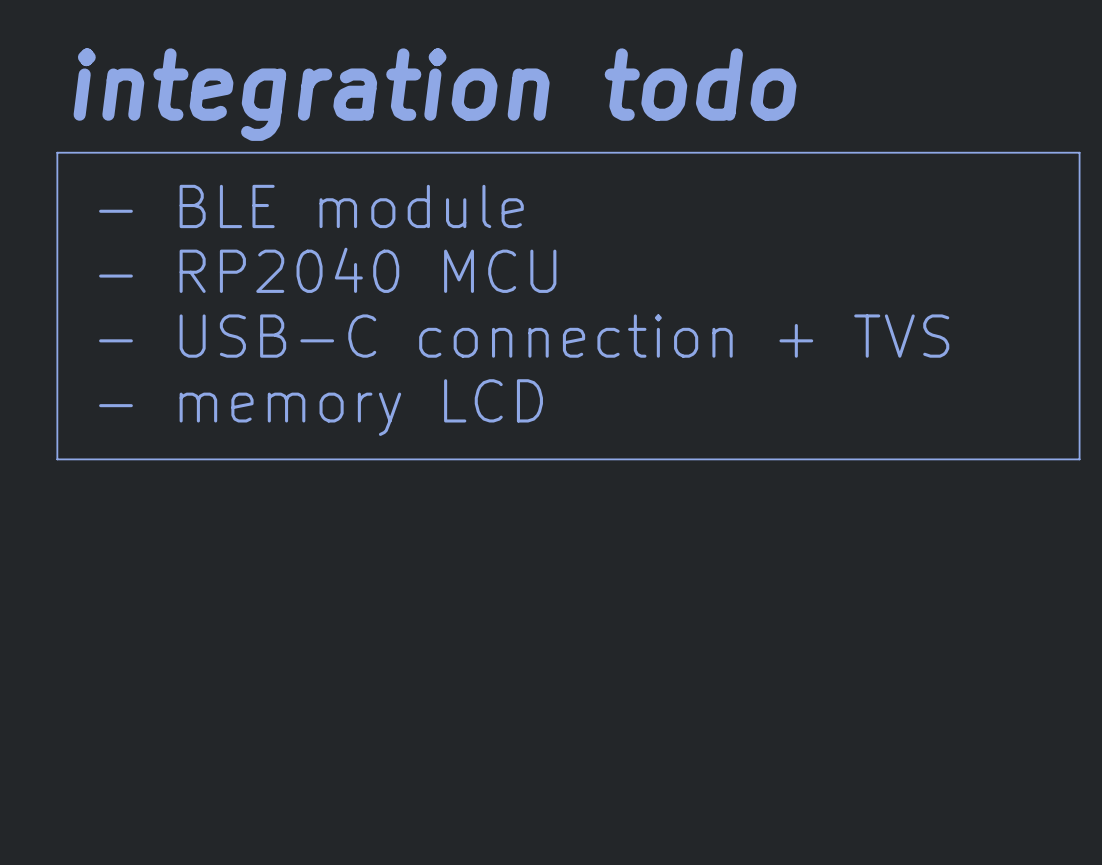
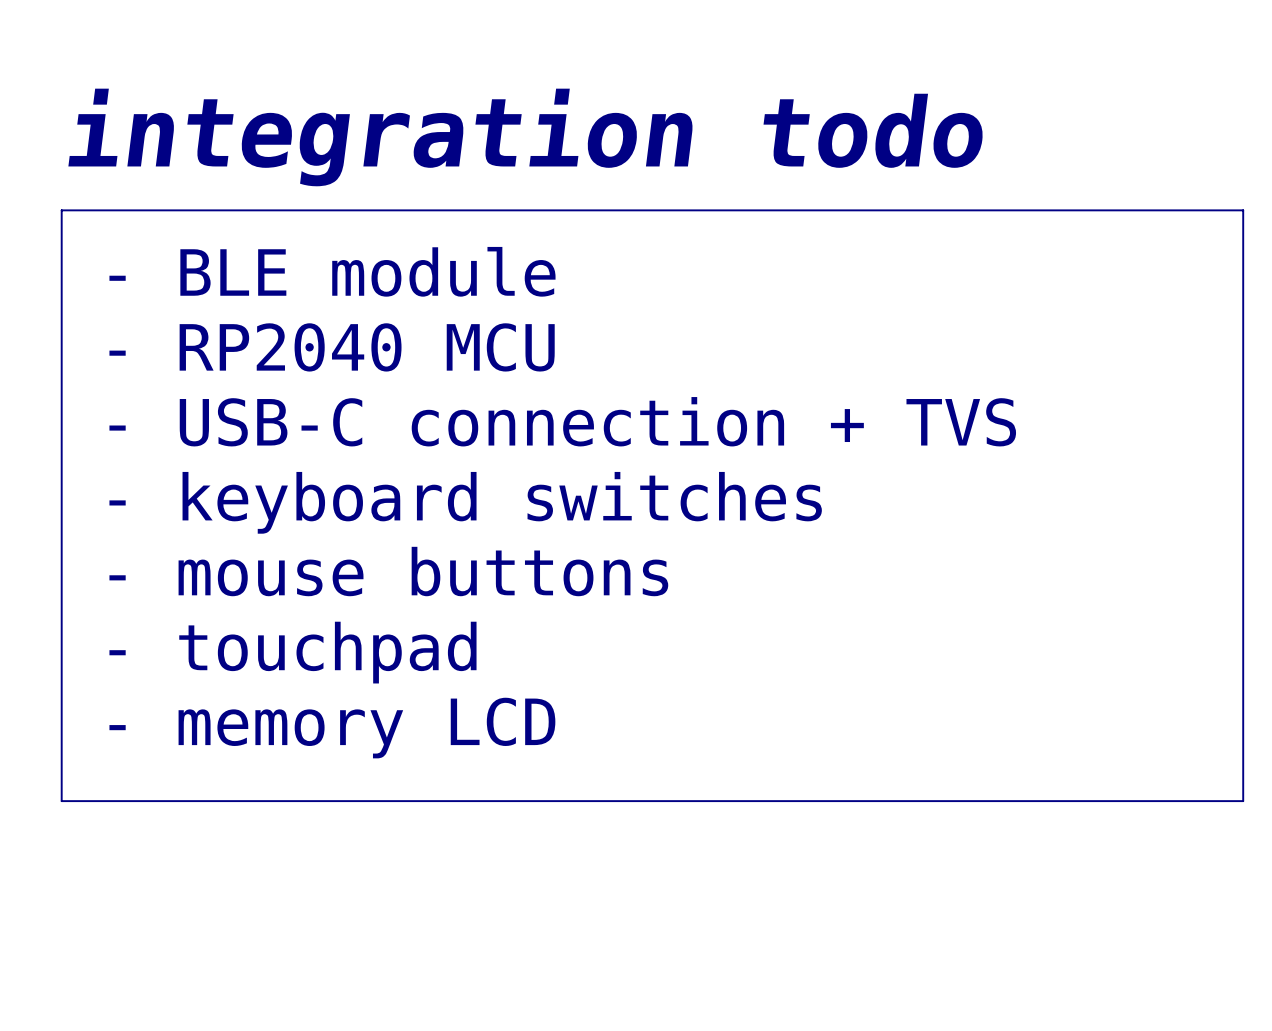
text: - memory LCD (321, 407) -> - keyboard switches (465, 502)
line: (57, 459) (1079, 459) -> (61, 564) (61, 801) (1243, 801) (1243, 564)
text: none -> - mouse buttons (388, 571)
text: none -> - touchpad (292, 652)
text: none -> - memory LCD (332, 728)

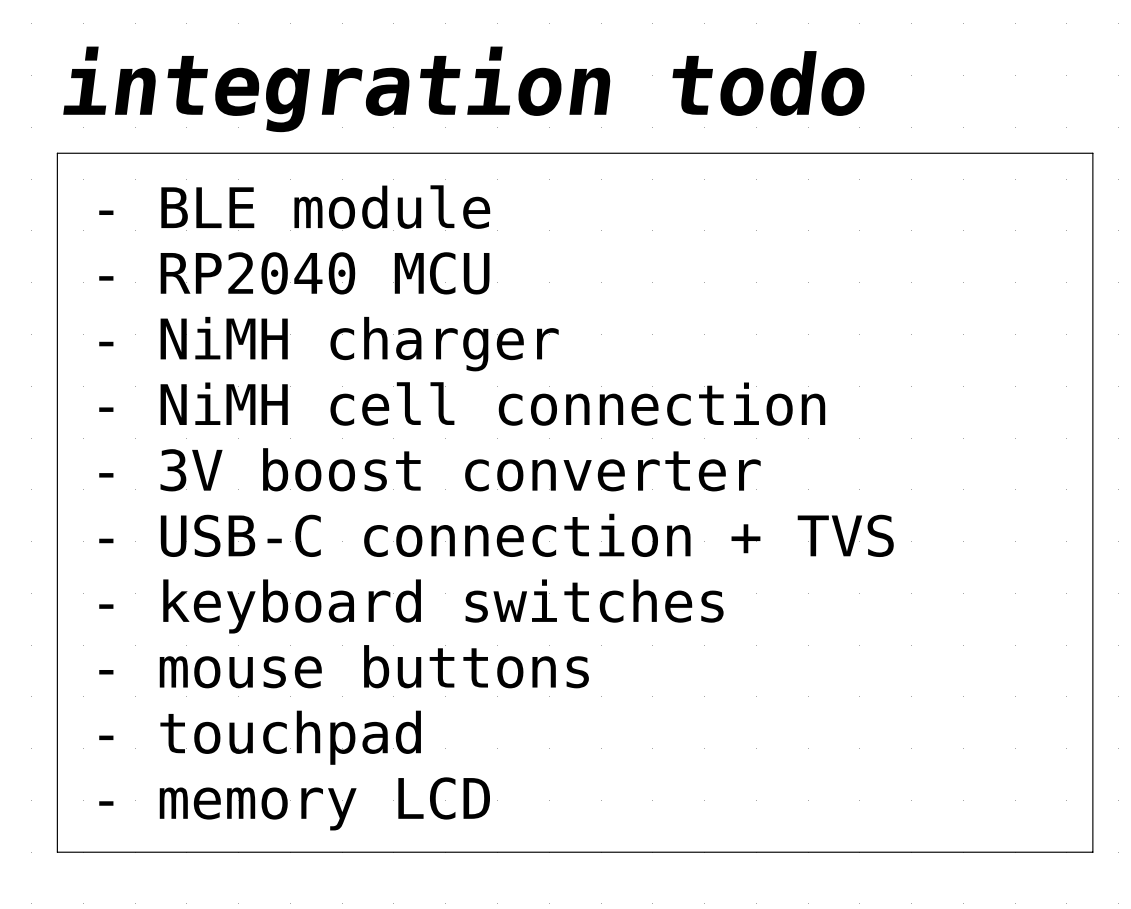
text: - USB-C connection + TVS (562, 421) -> - NiMH charger (328, 344)
text: - keyboard switches (465, 502) -> - NiMH cell connection (462, 404)
text: - mouse buttons (388, 571) -> - 3V boost converter (429, 469)
text: - touchpad (292, 652) -> - USB-C connection + TVS (496, 535)
text: - memory LCD (332, 728) -> - keyboard switches (411, 606)
text: none -> - mouse buttons (344, 666)
line: (61, 801) (1243, 801) -> (57, 671) (57, 852) (1092, 852) (1092, 671)
text: none -> - touchpad (260, 737)
text: none -> - memory LCD (294, 803)

